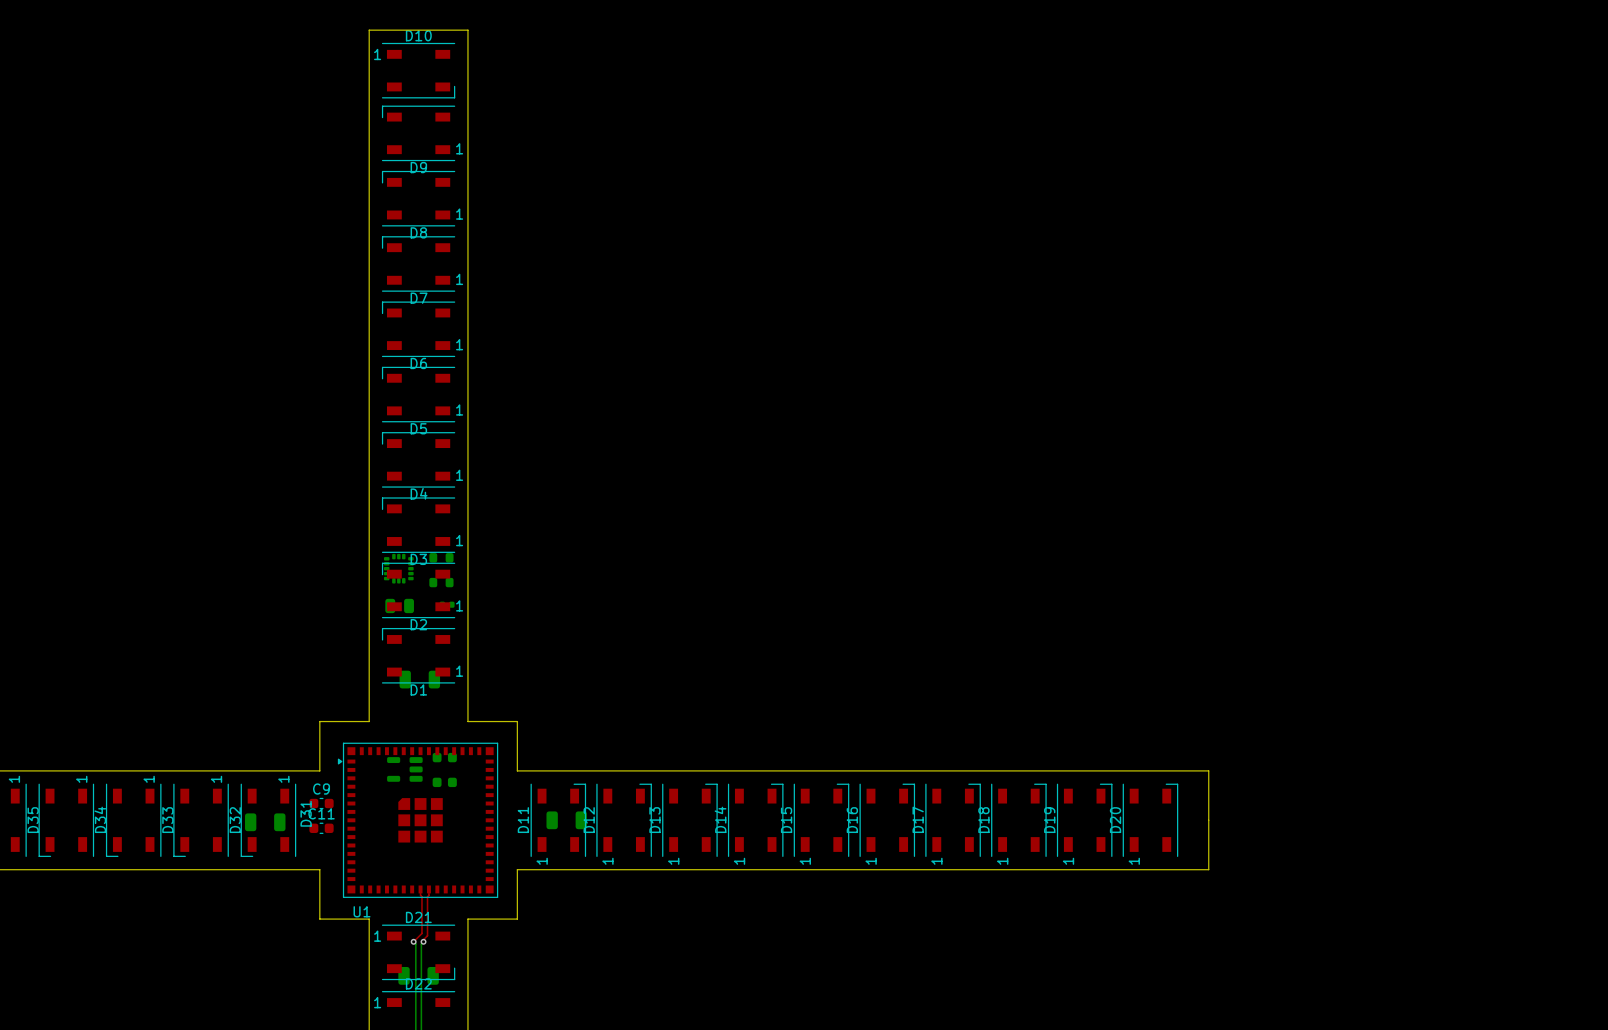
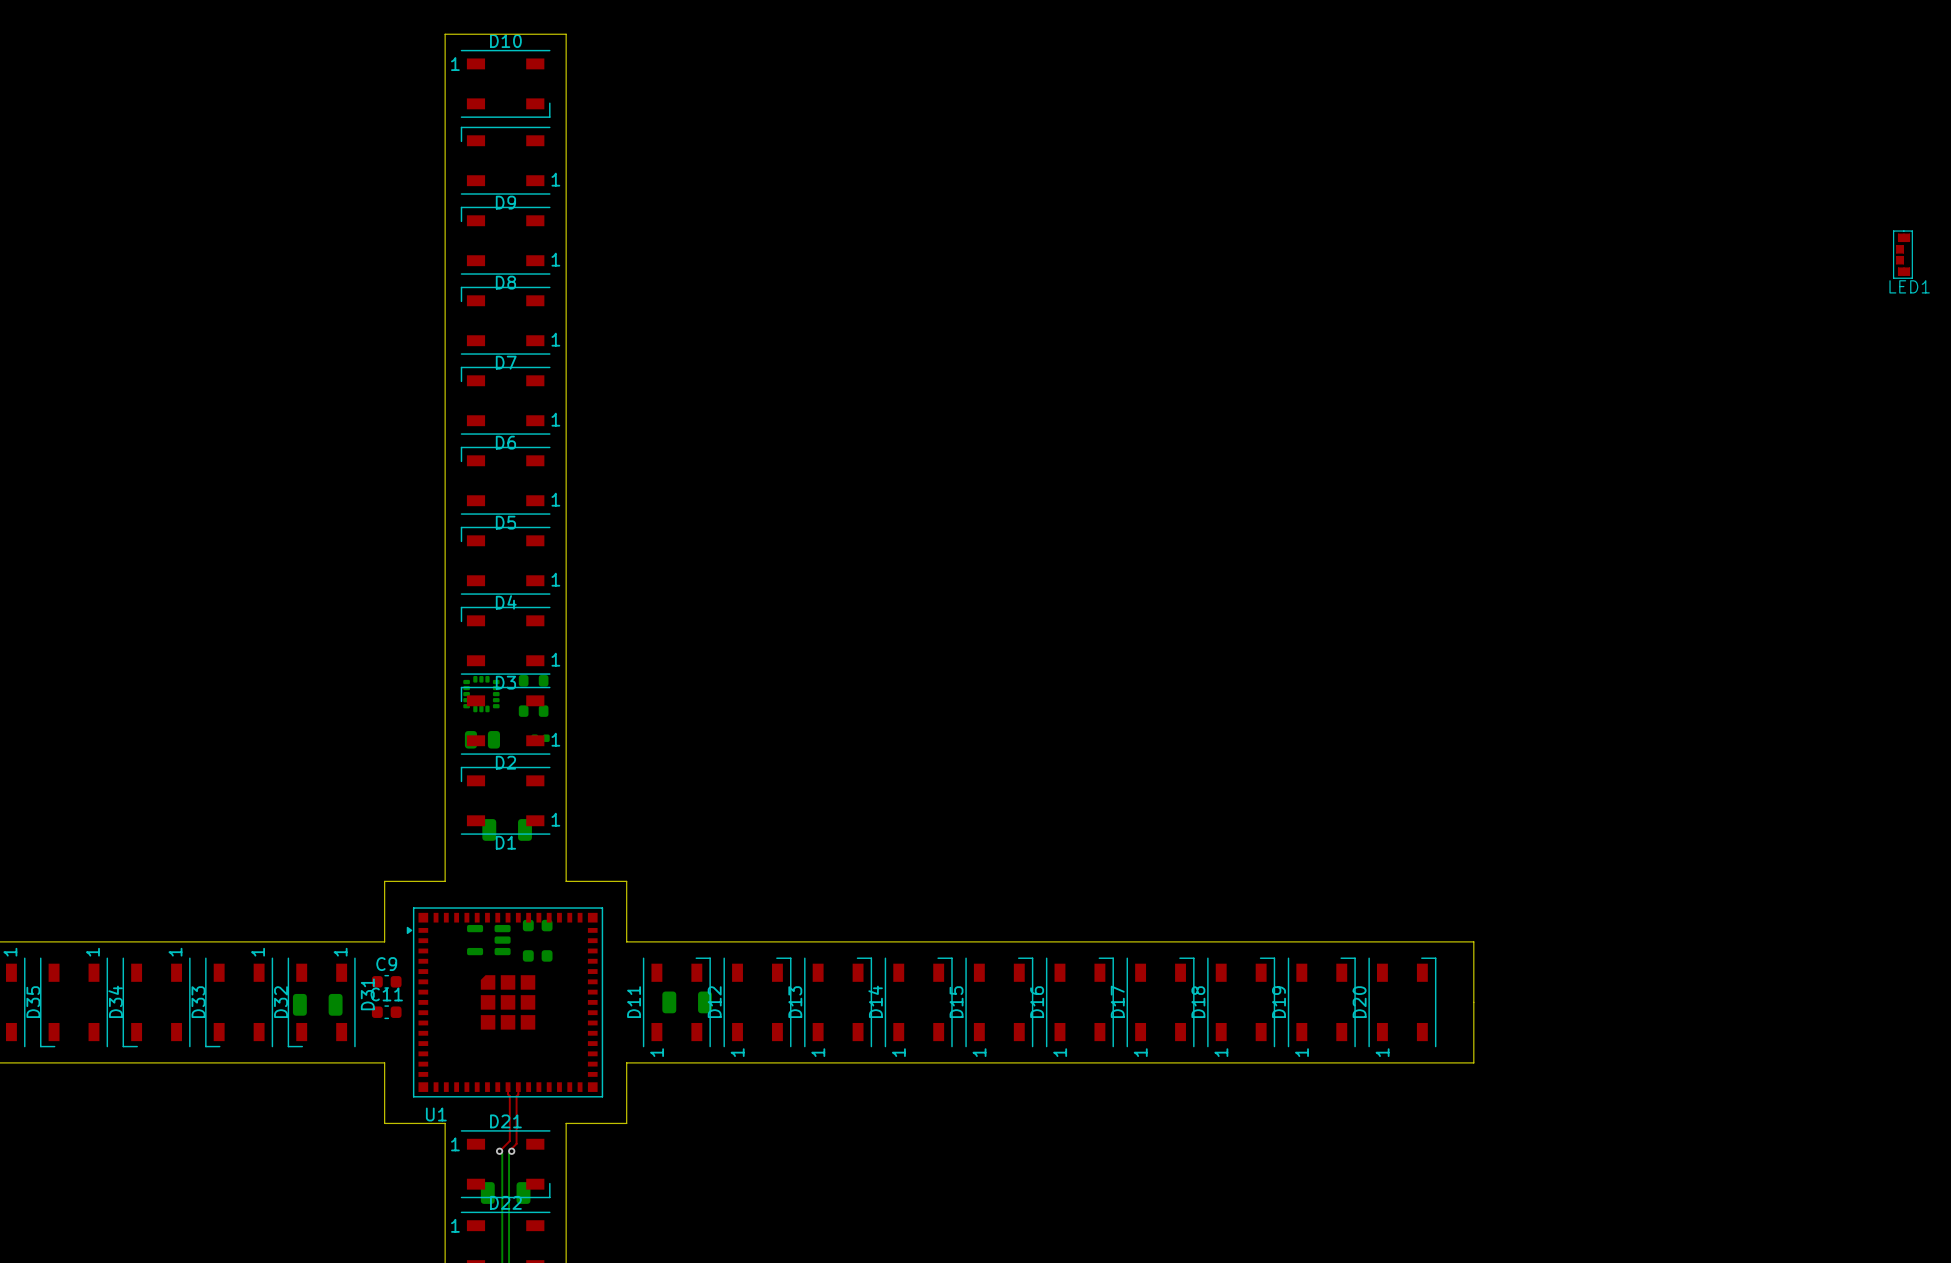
LED1: none -> (1902, 254)

